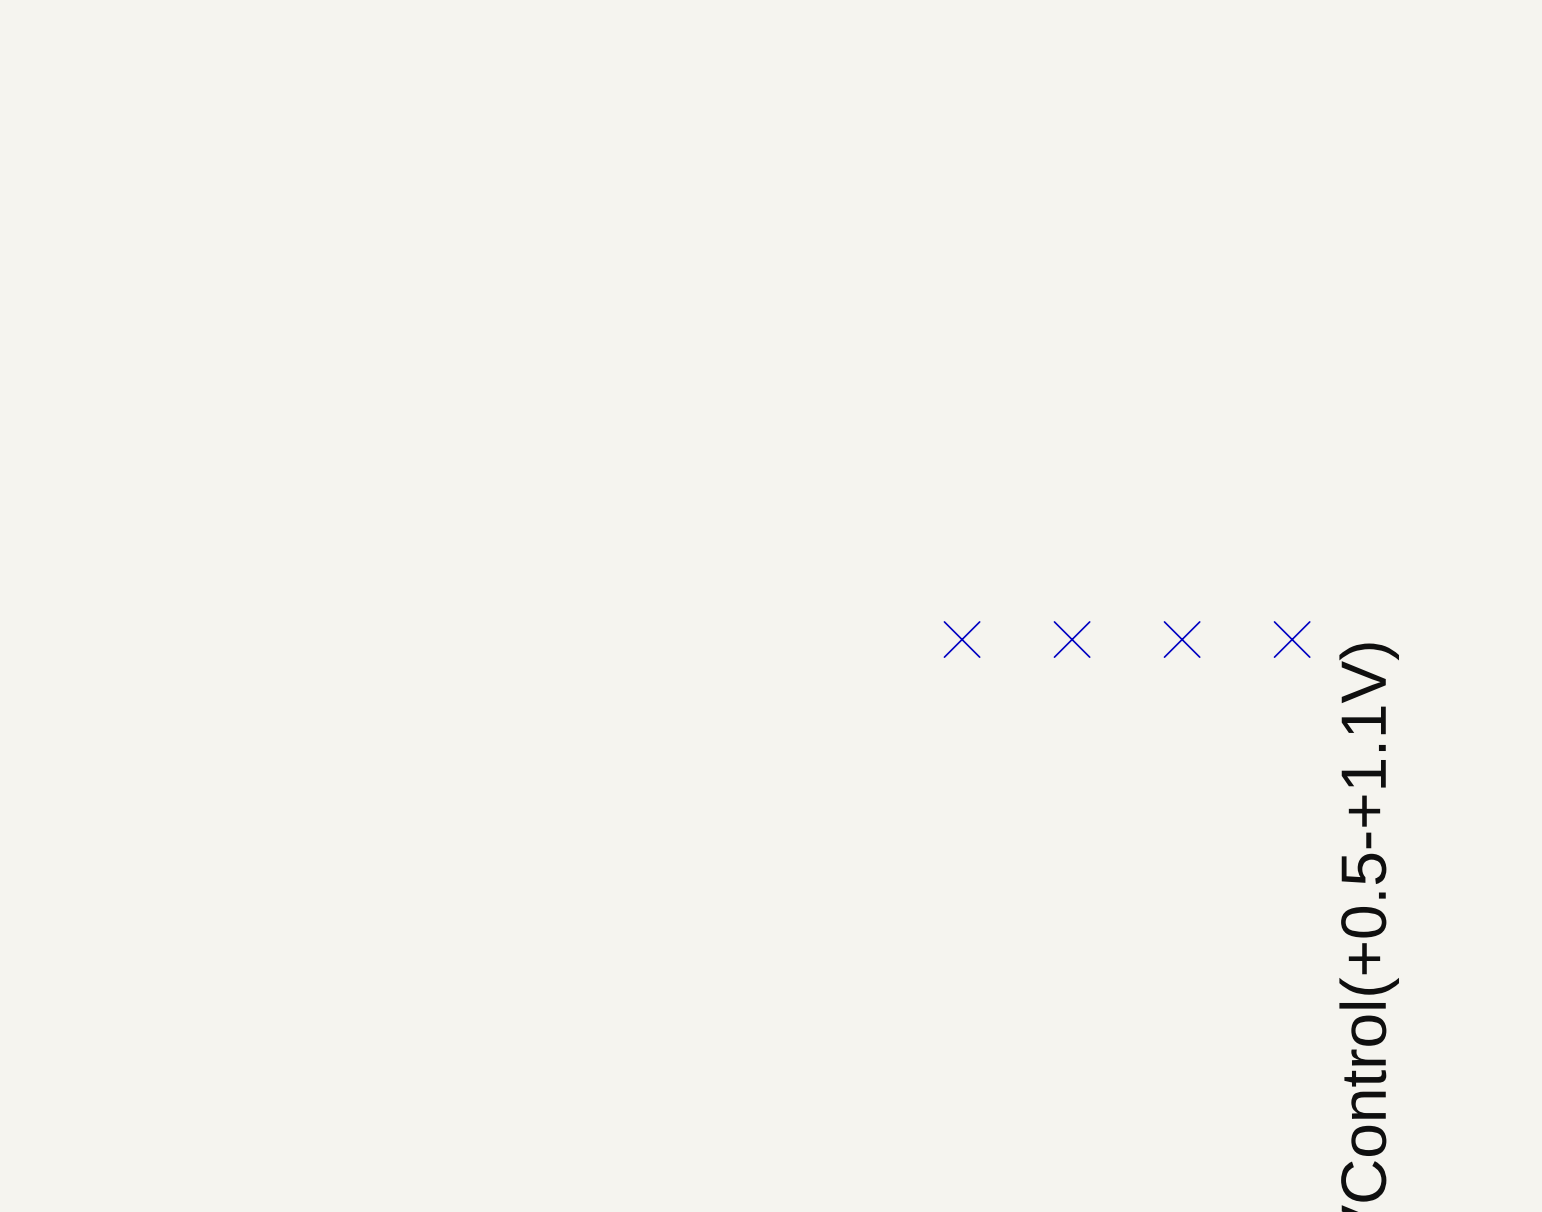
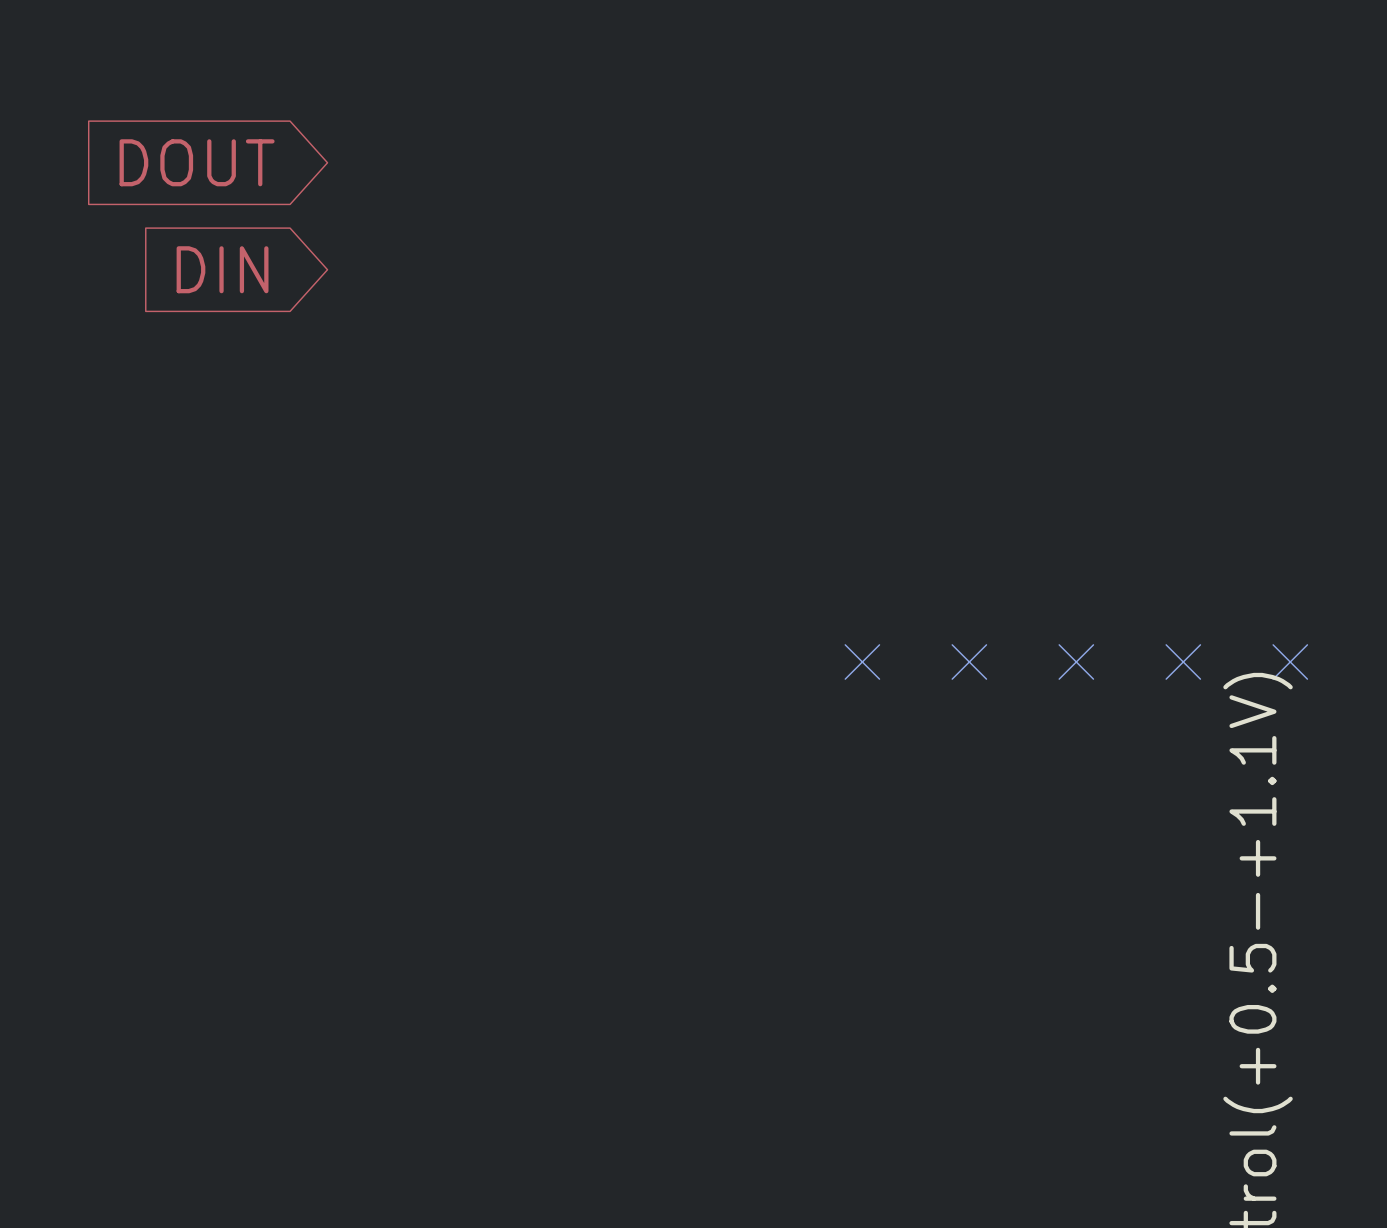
global label: none -> DOUT (197, 162)
global label: none -> DIN (222, 269)
no-connect mark: none -> (1290, 661)

